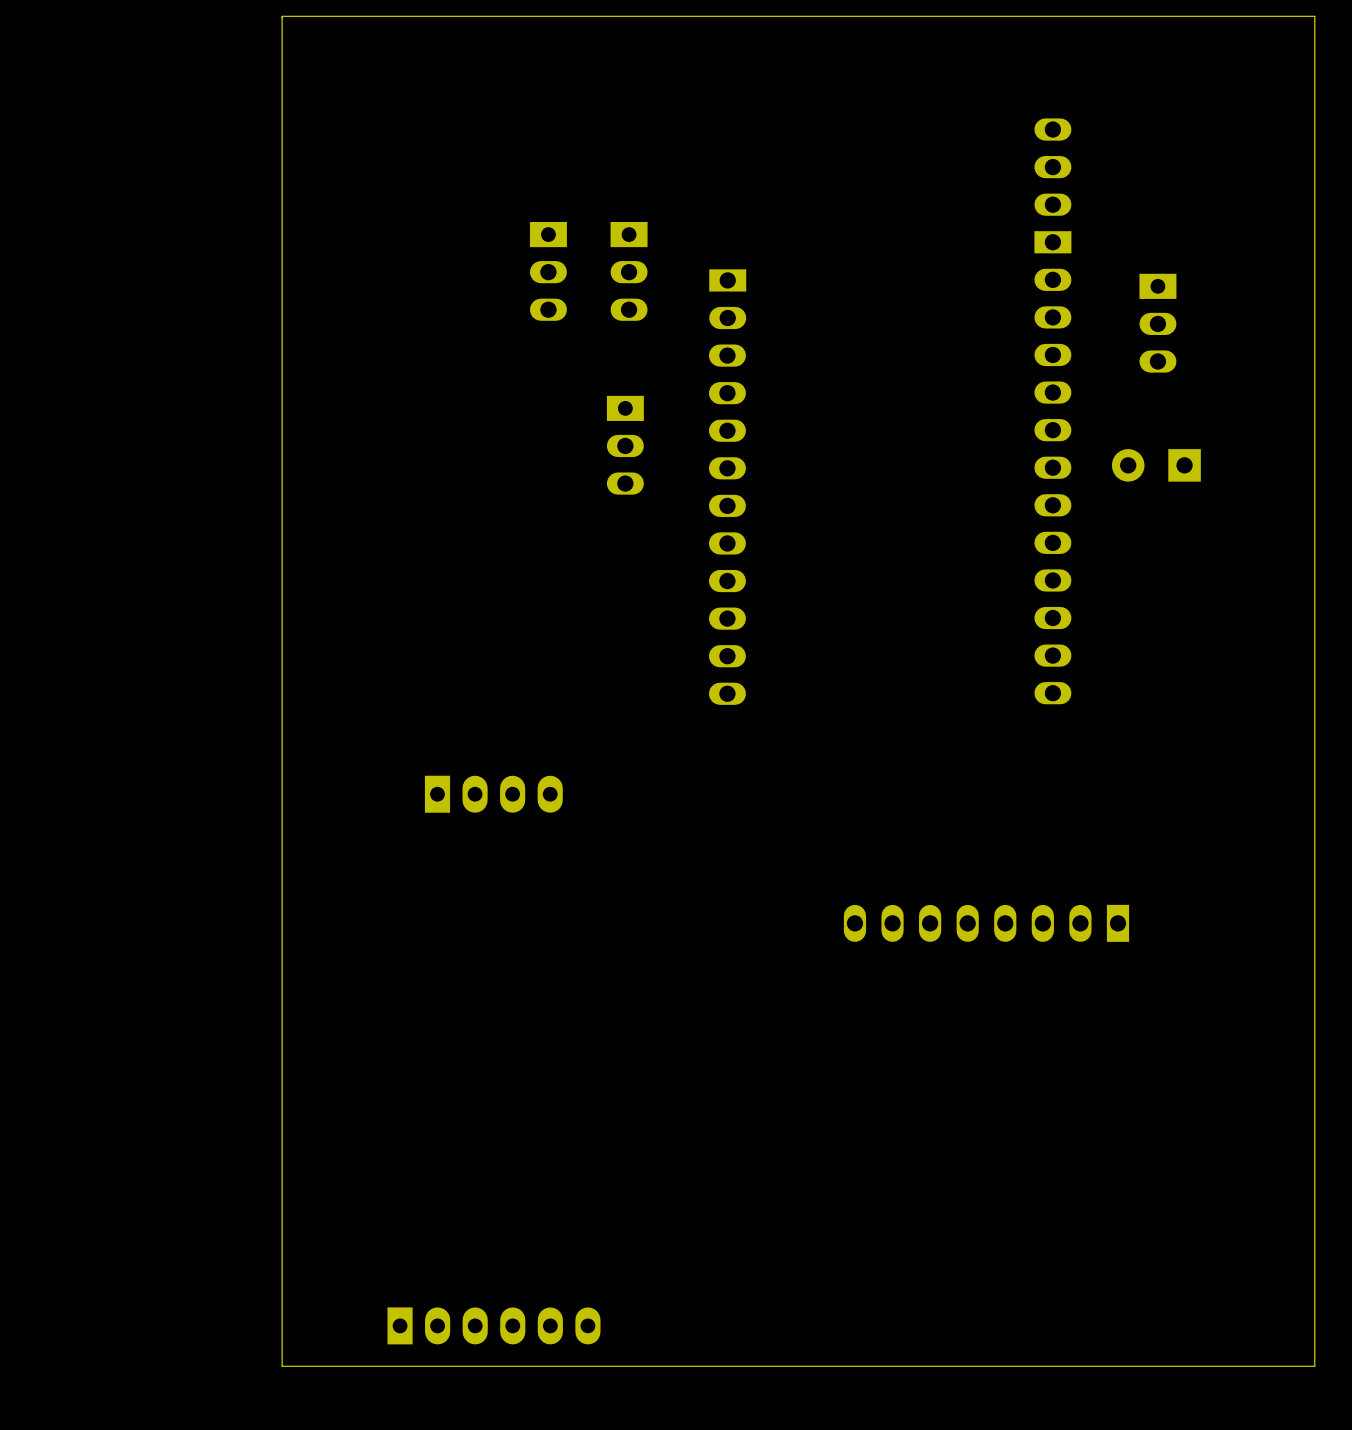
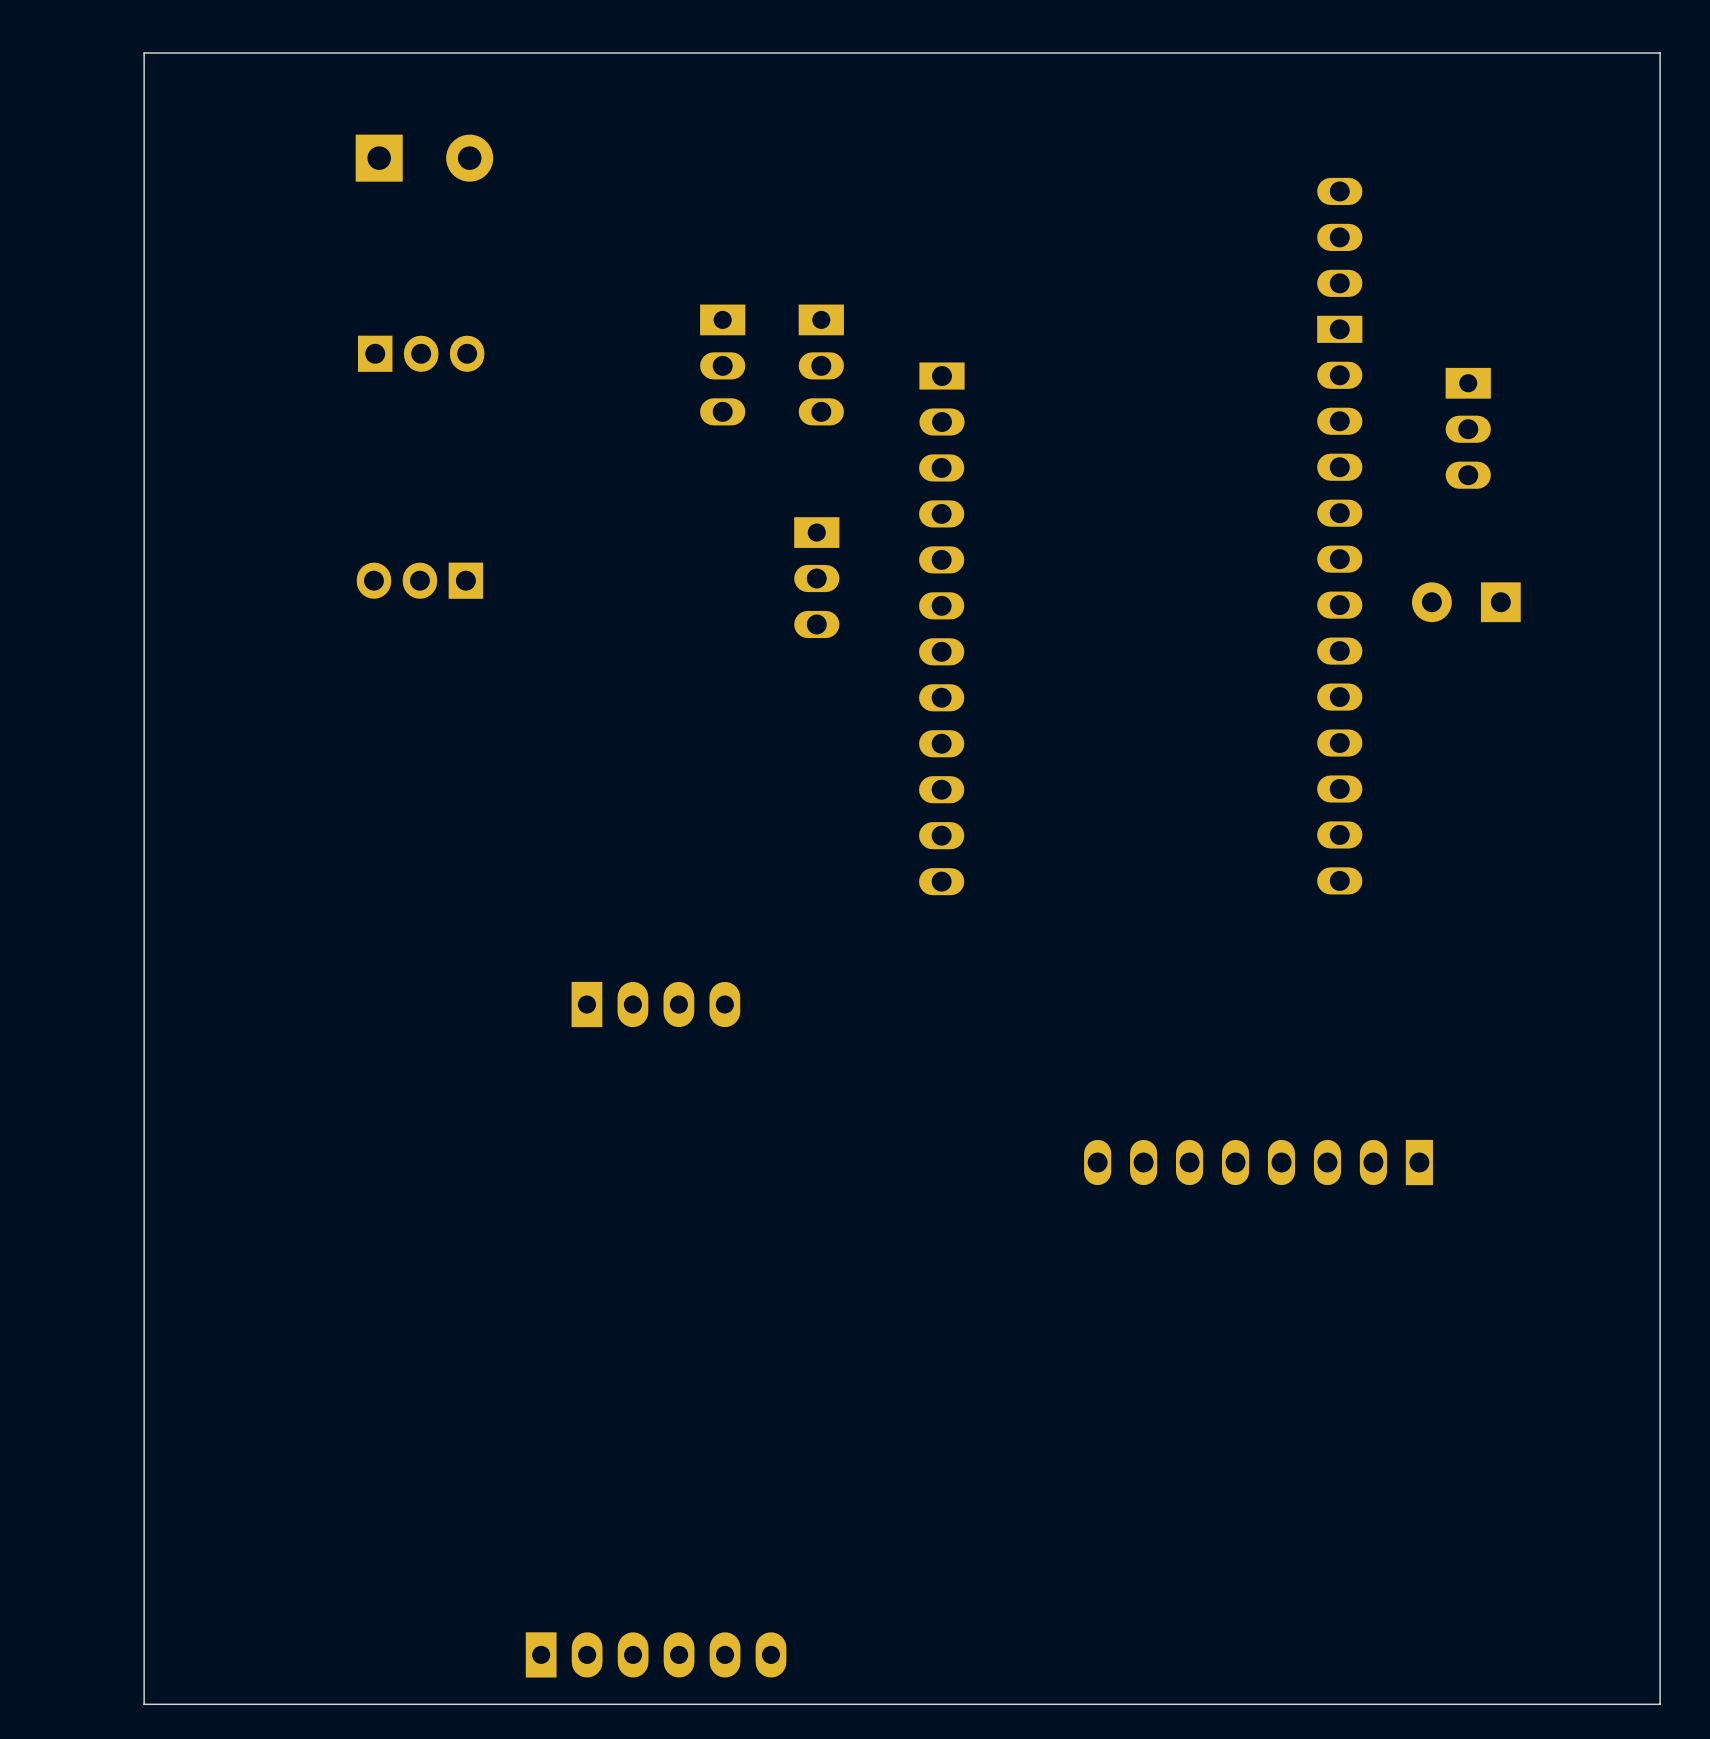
board edge: (282, 16) (282, 1366) -> (396, 53) (144, 53) (144, 1704) (396, 1704)
part: none -> (424, 158)
part: none -> (421, 353)
part: none -> (419, 580)

